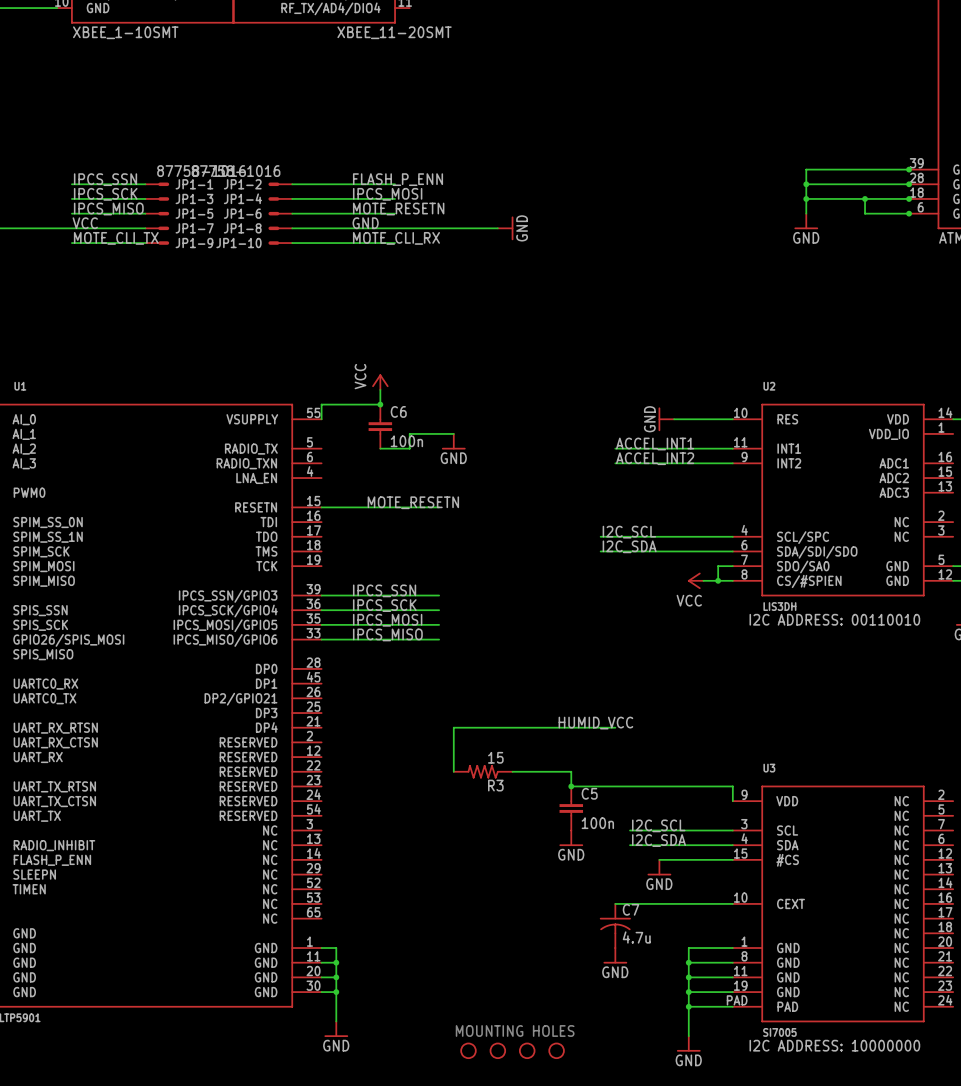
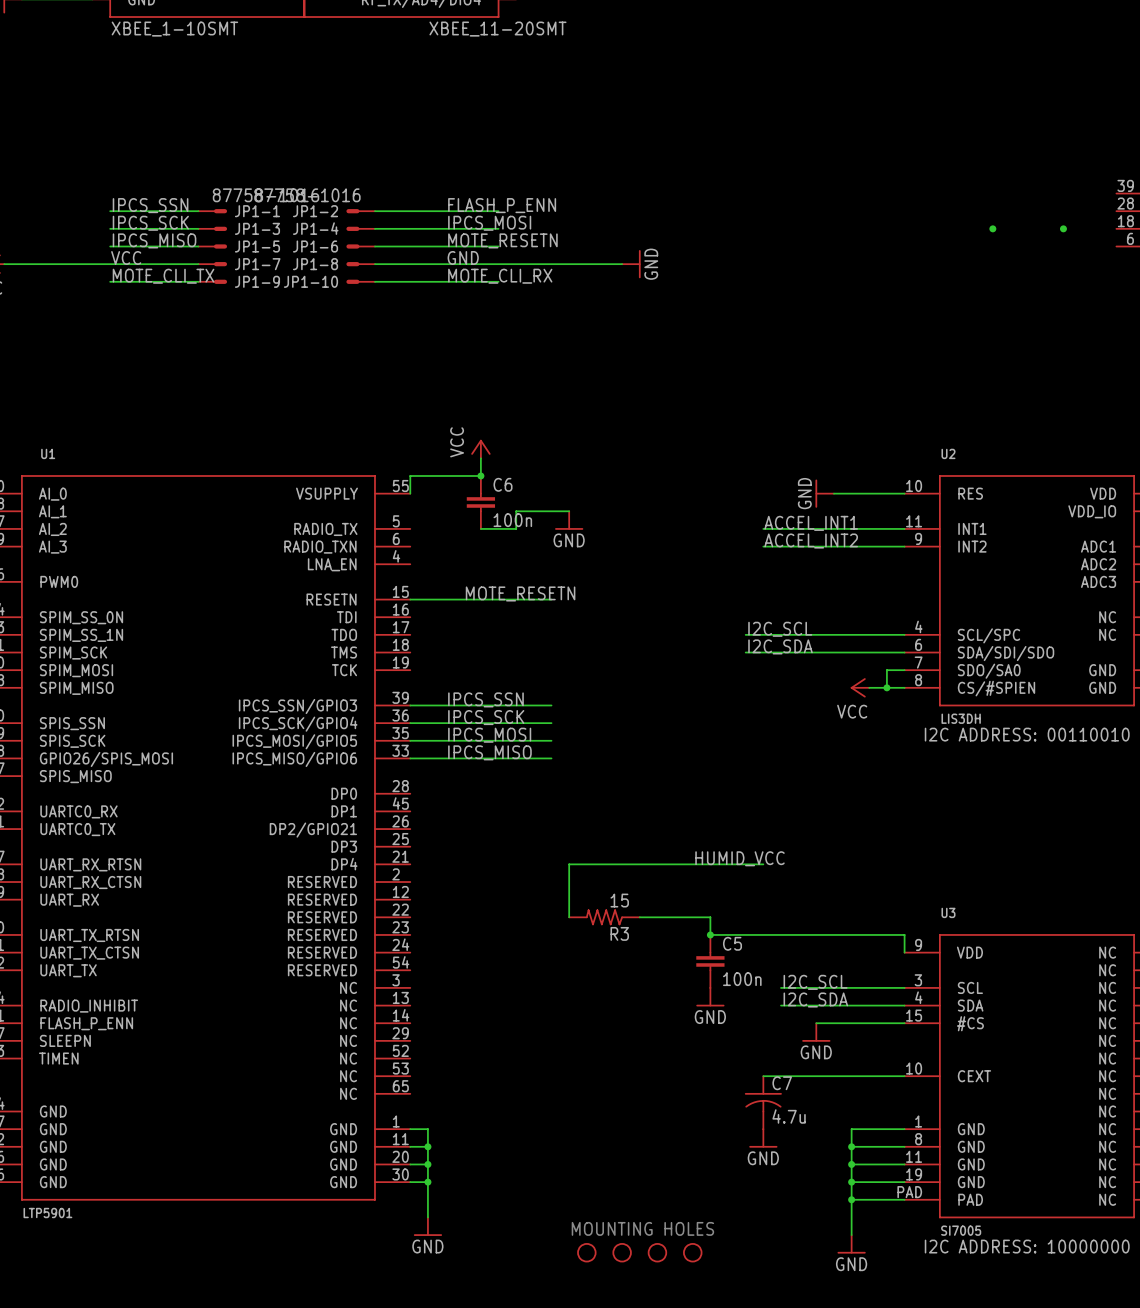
wire: (909, 169) (806, 169) (806, 213) -> none
junction: (909, 169) -> none
wire: (806, 184) (909, 184) -> none
junction: (806, 184) -> none
junction: (909, 184) -> none
wire: (806, 198) (909, 198) -> none
wire: (865, 198) (865, 213) (909, 213) -> none
junction: (909, 198) -> none
junction: (909, 213) -> none
power symbol: GND (806, 221) -> none

